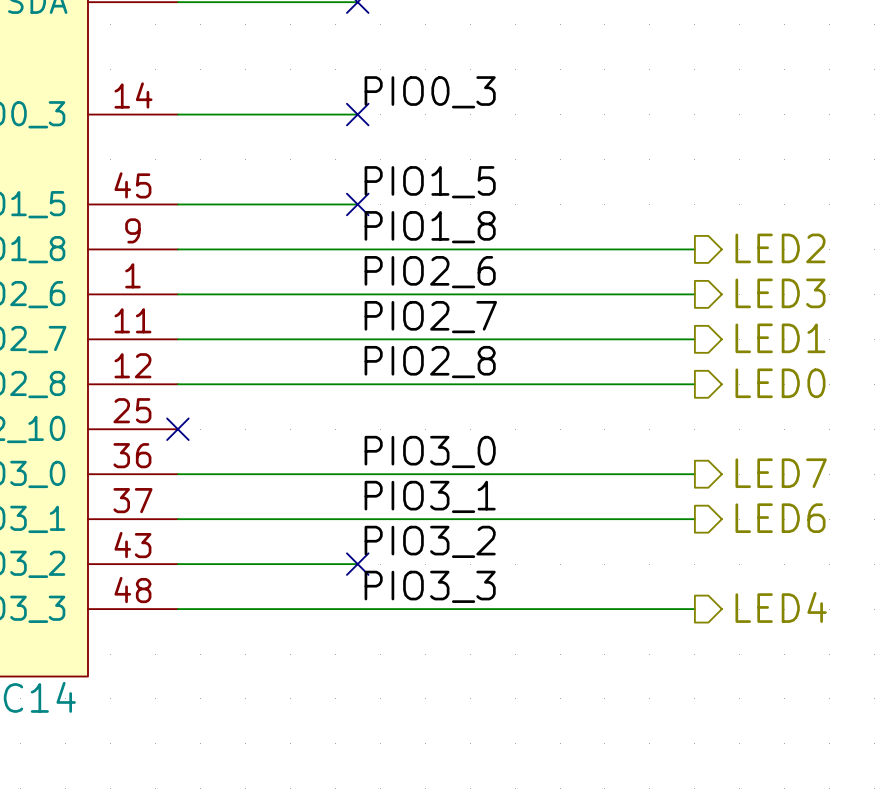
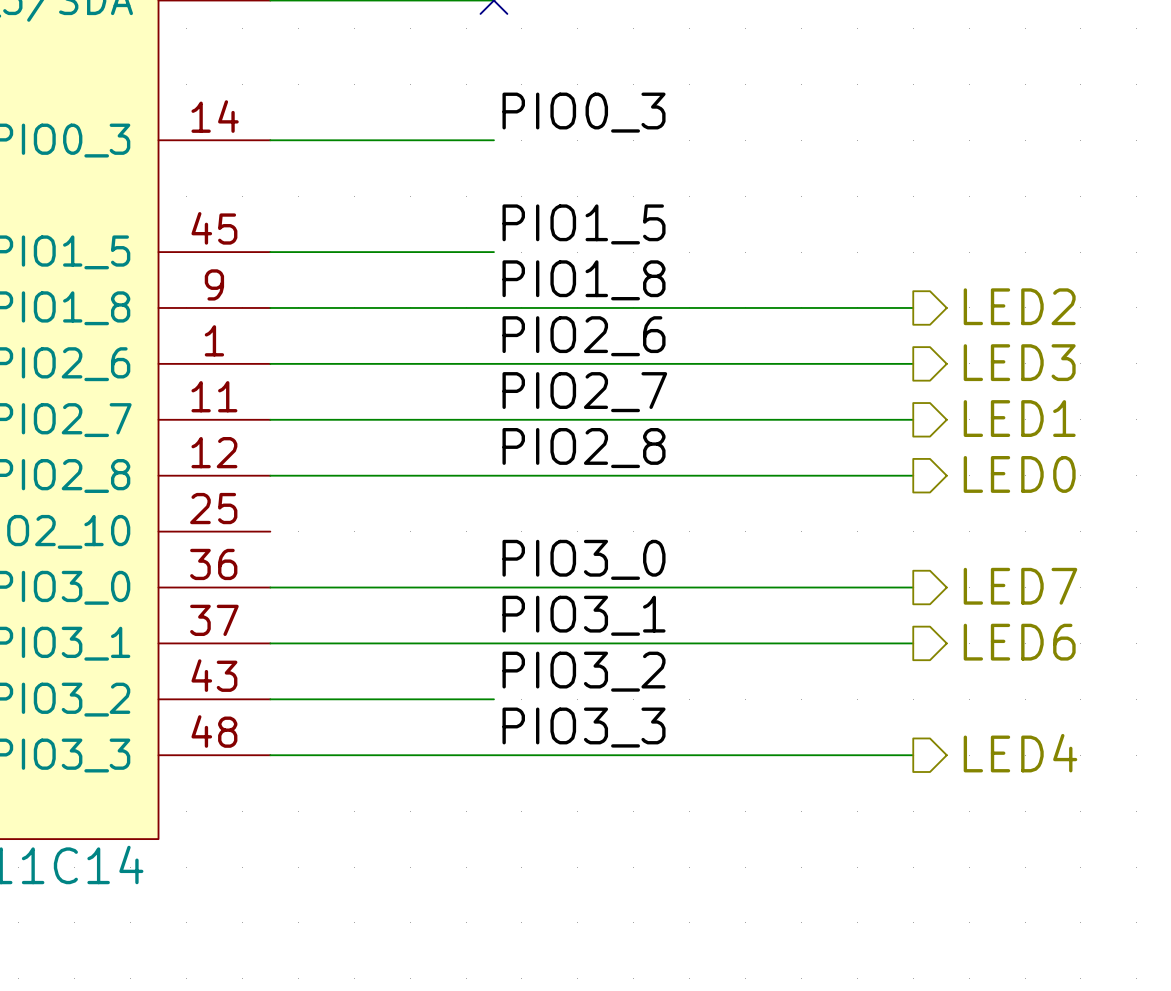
no-connect mark: (357, 114) -> none
no-connect mark: (357, 204) -> none
no-connect mark: (177, 429) -> none
no-connect mark: (357, 564) -> none

